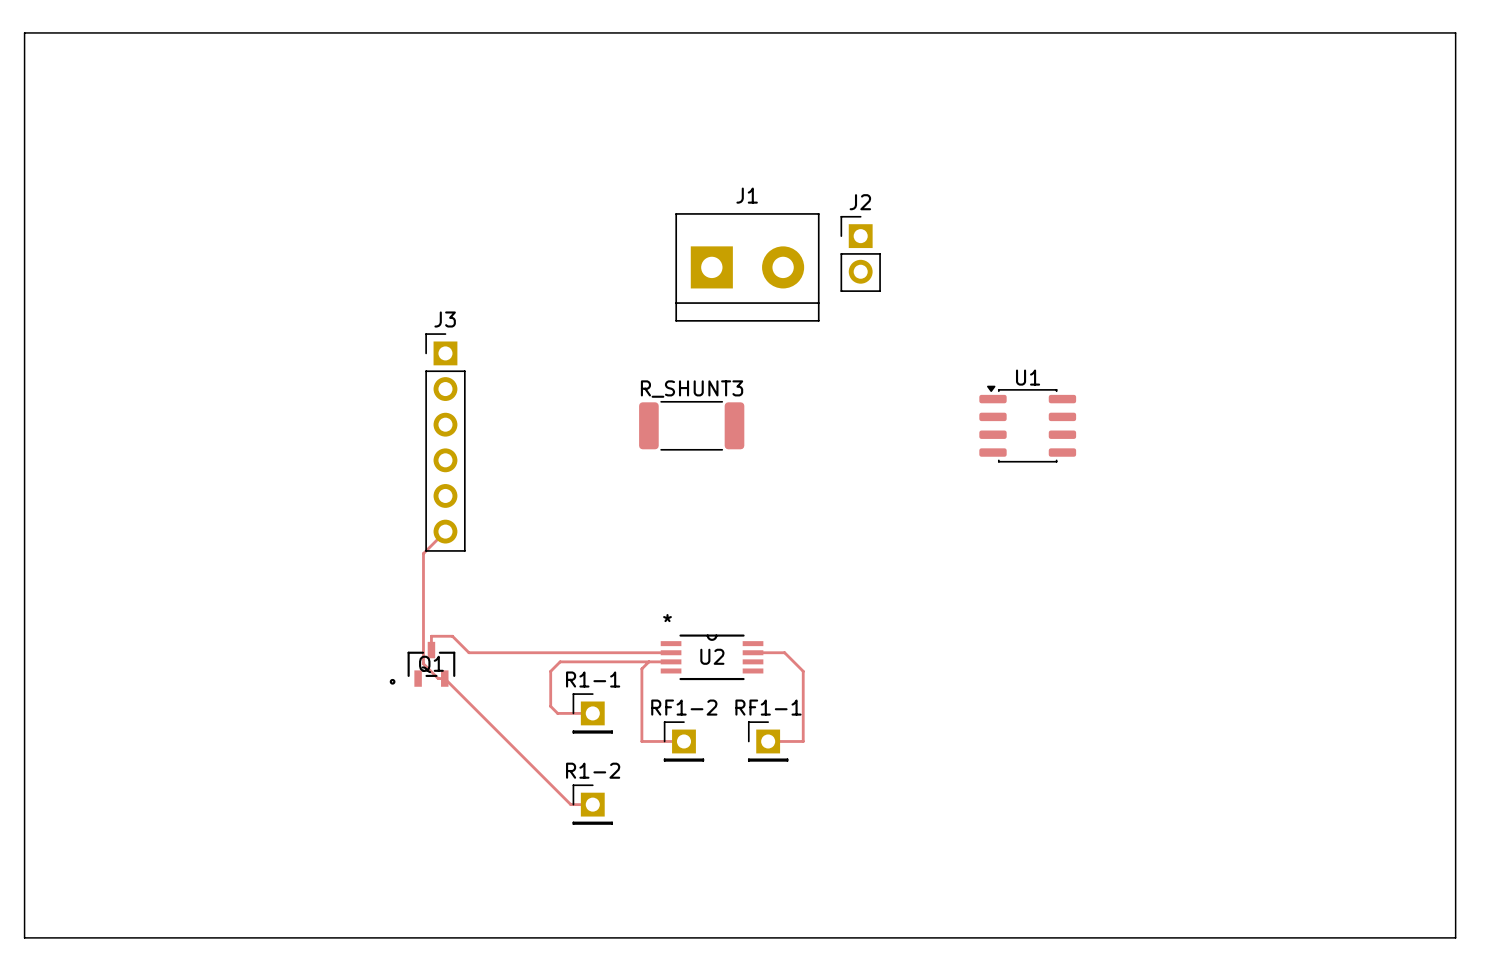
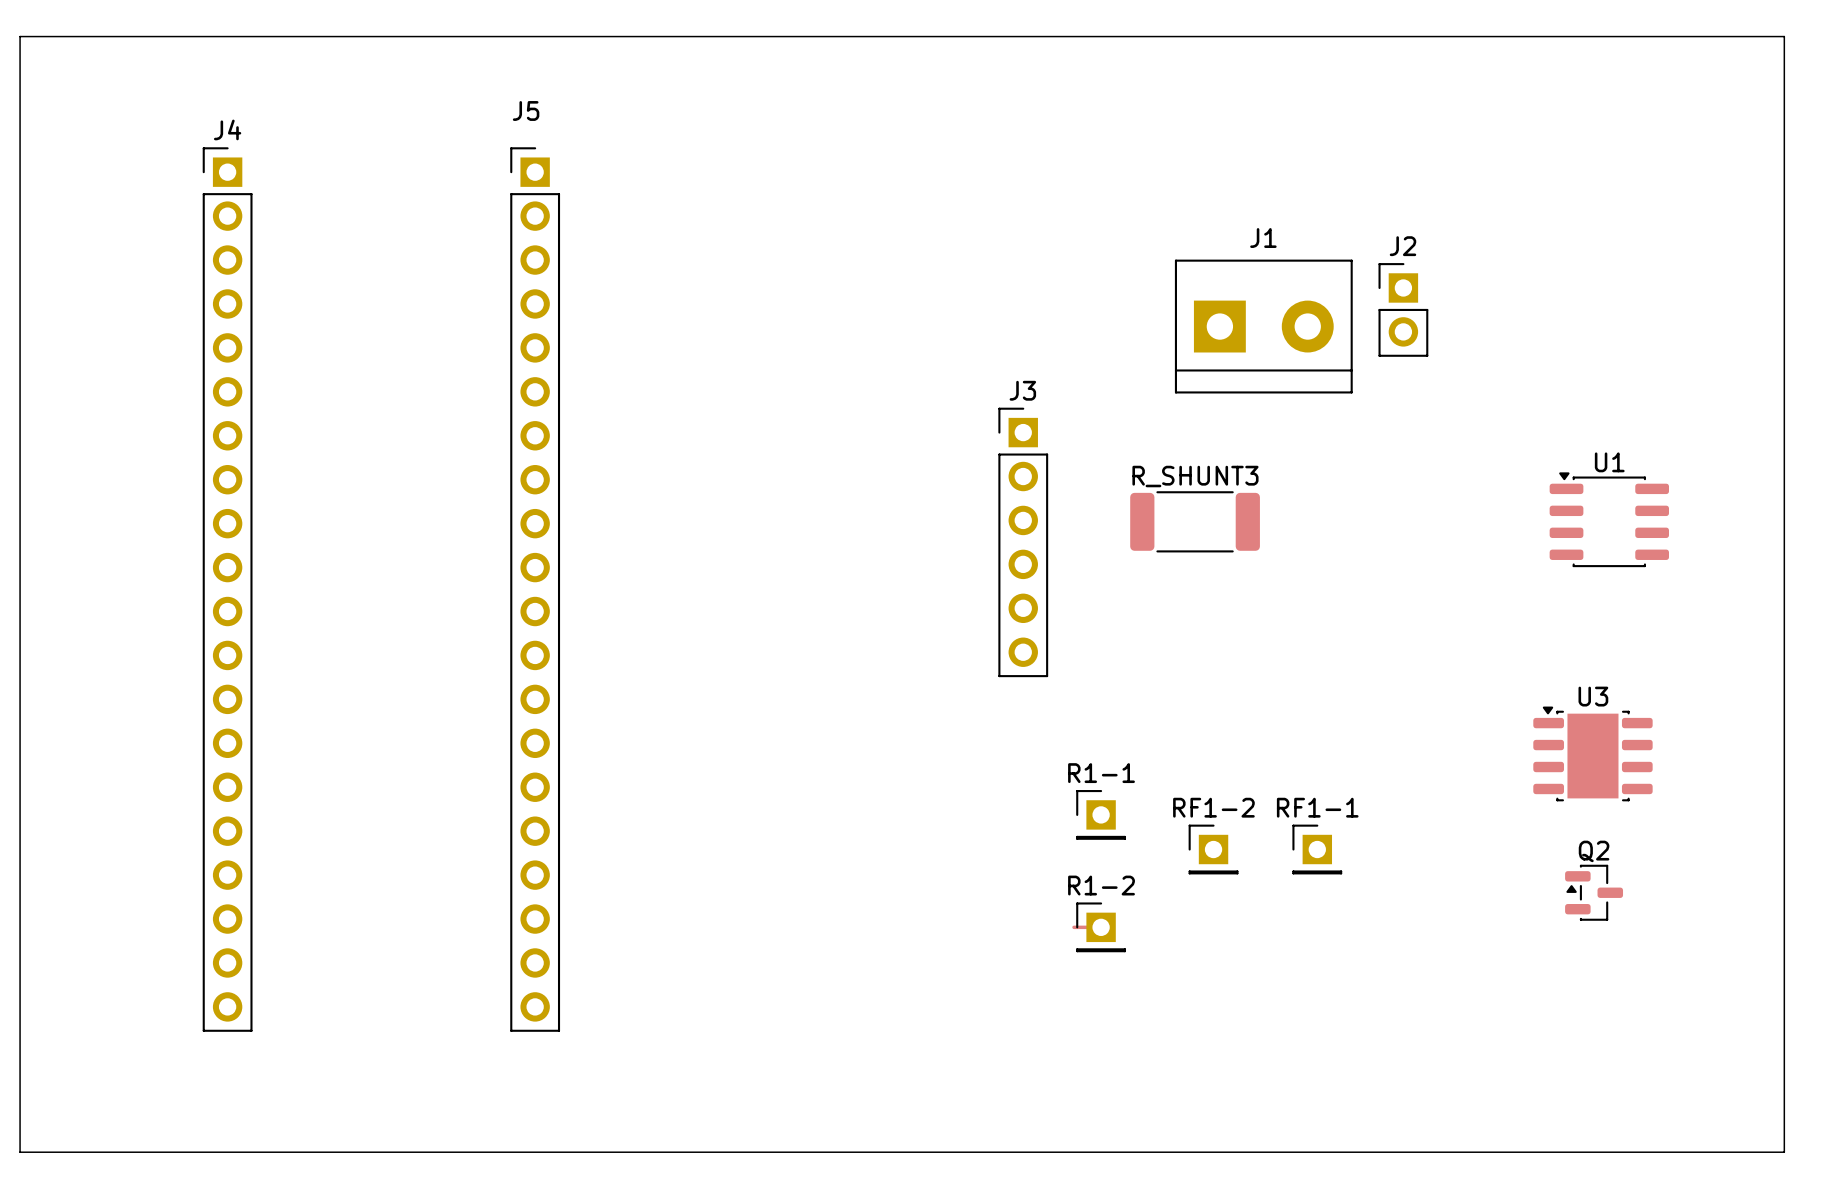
J2 position: (860, 253) -> (1403, 309)
J1 position: (747, 267) -> (1263, 326)
U1 position: (1027, 424) -> (1609, 519)
R_SHUNT3 position: (691, 425) -> (1195, 521)
J3 position: (445, 442) -> (1023, 542)
J4: none -> (227, 589)
J5: none -> (535, 589)
track: (445, 531) (423, 553) (423, 663) (438, 678) (444, 678) (570, 804) (592, 804) -> none
U3: none -> (1592, 753)
track: (431, 650) (431, 636) (452, 636) (468, 652) (671, 652) -> none
track: (753, 652) (784, 652) (803, 671) (803, 741) (768, 741) -> none
U2: (712, 657) -> none
track: (648, 661) (641, 668) (641, 741) (683, 741) -> none
track: (671, 661) (560, 661) (550, 671) (550, 706) (557, 713) (592, 713) -> none
Q1: (422, 664) -> none
R1-1 position: (592, 713) -> (1101, 814)
Q2: none -> (1594, 892)
RF1-2 position: (683, 741) -> (1213, 849)
RF1-1 position: (768, 741) -> (1317, 849)
track: none -> (1074, 927) (1101, 927)
R1-2 position: (592, 804) -> (1101, 927)

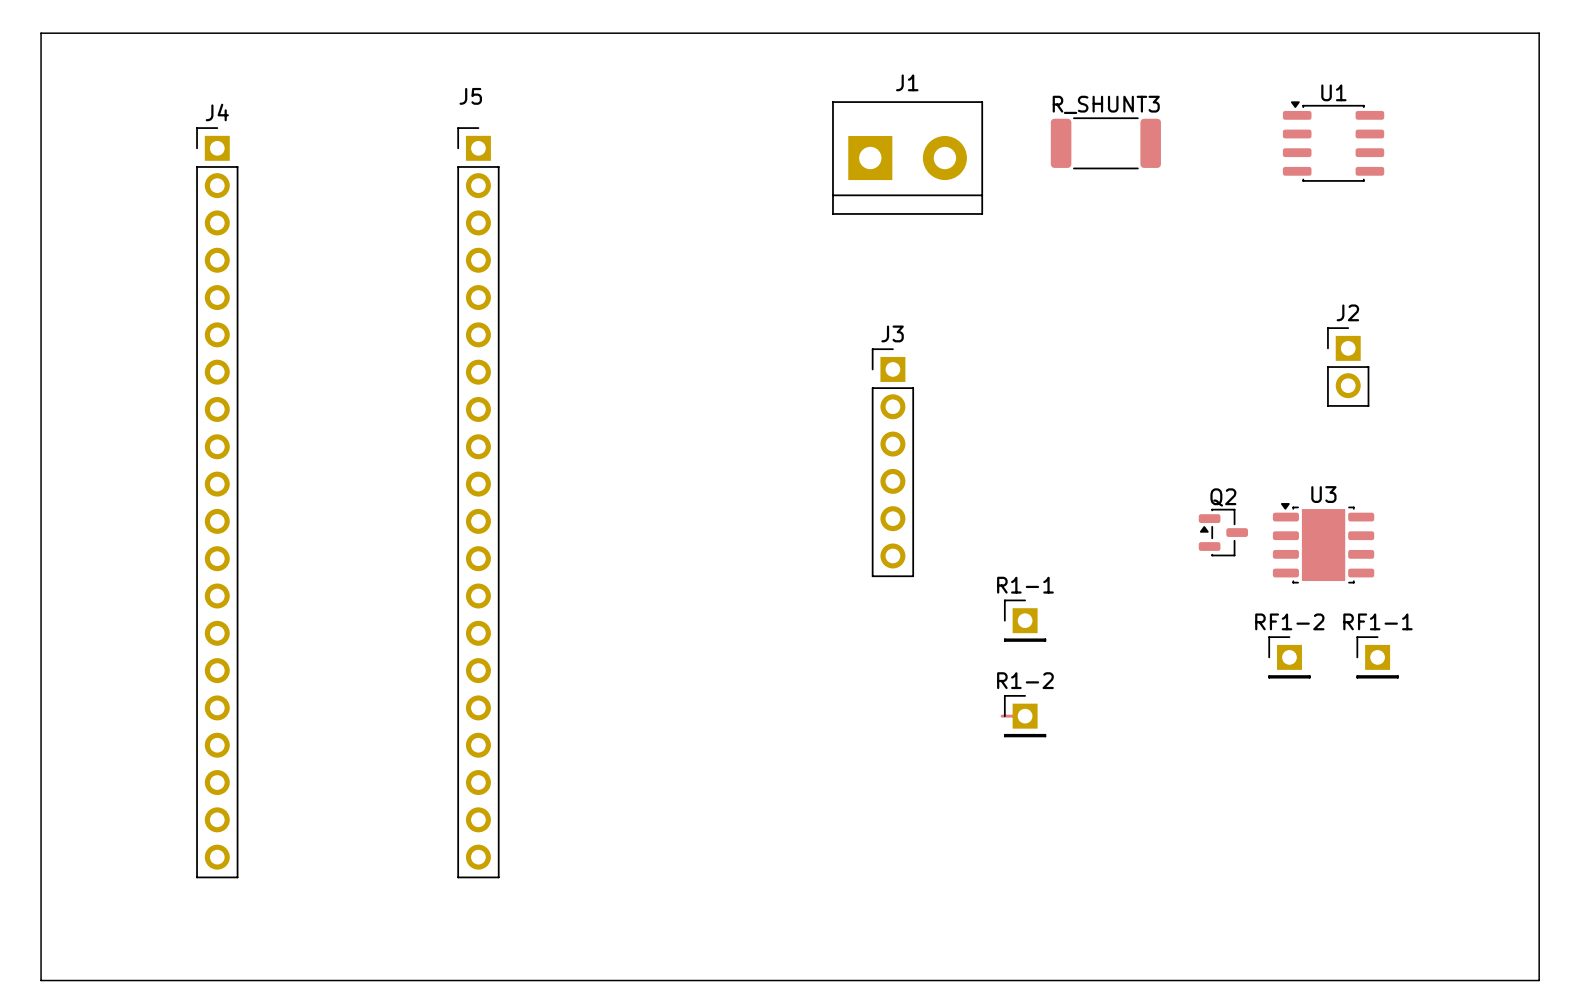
J2 position: (1403, 309) -> (1348, 367)
J1 position: (1263, 326) -> (907, 158)
U1 position: (1609, 519) -> (1333, 141)
R_SHUNT3 position: (1195, 521) -> (1105, 143)
U3 position: (1592, 753) -> (1323, 543)
R1-1 position: (1101, 814) -> (1025, 620)
RF1-2 position: (1213, 849) -> (1289, 657)
RF1-1 position: (1317, 849) -> (1377, 657)
Q2 position: (1594, 892) -> (1223, 532)
track: (1074, 927) (1101, 927) -> (1002, 716) (1025, 716)
R1-2 position: (1101, 927) -> (1025, 716)

